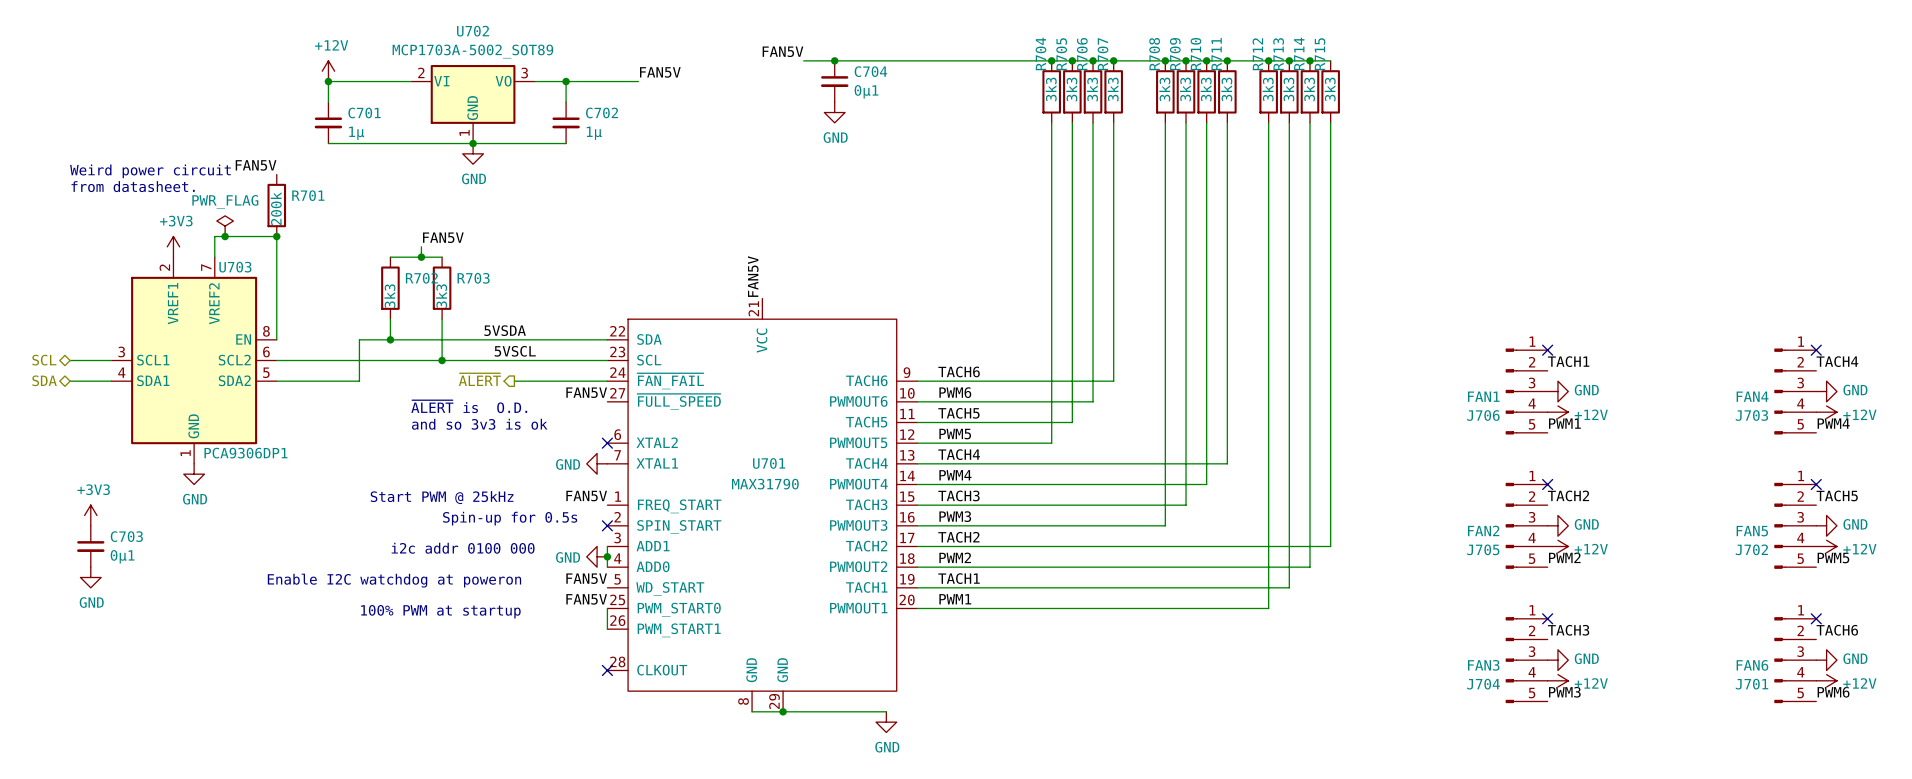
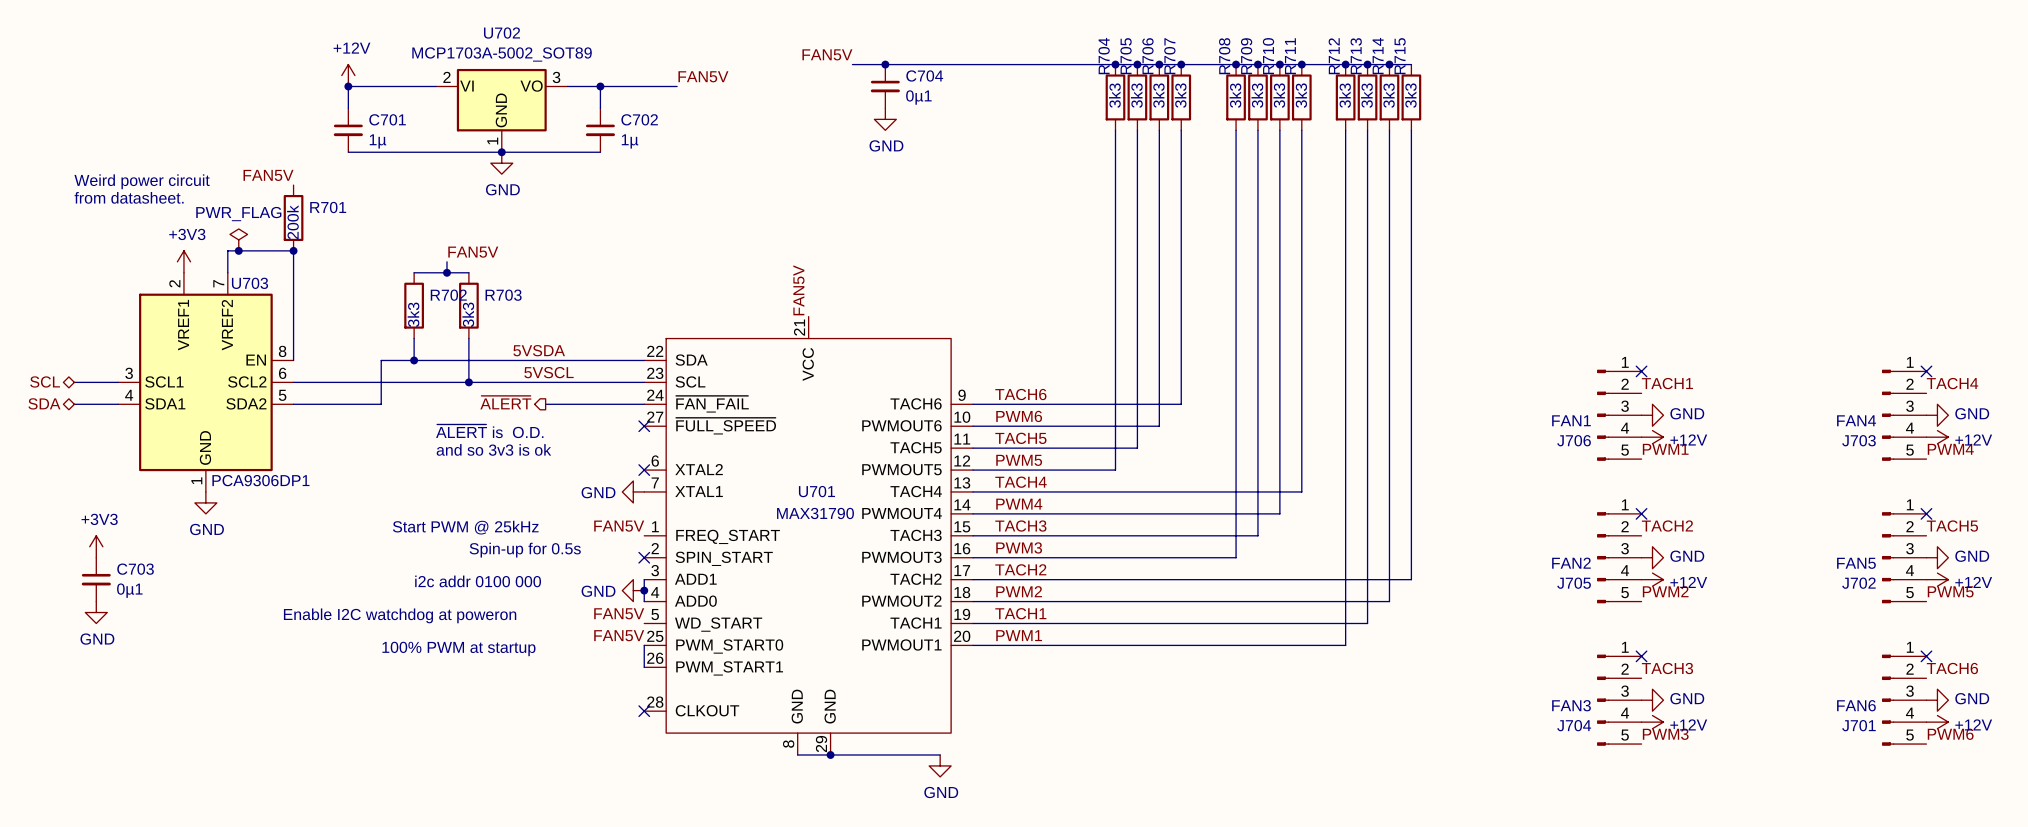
label: FAN5V (586, 392) -> none
no-connect mark: none -> (644, 426)

